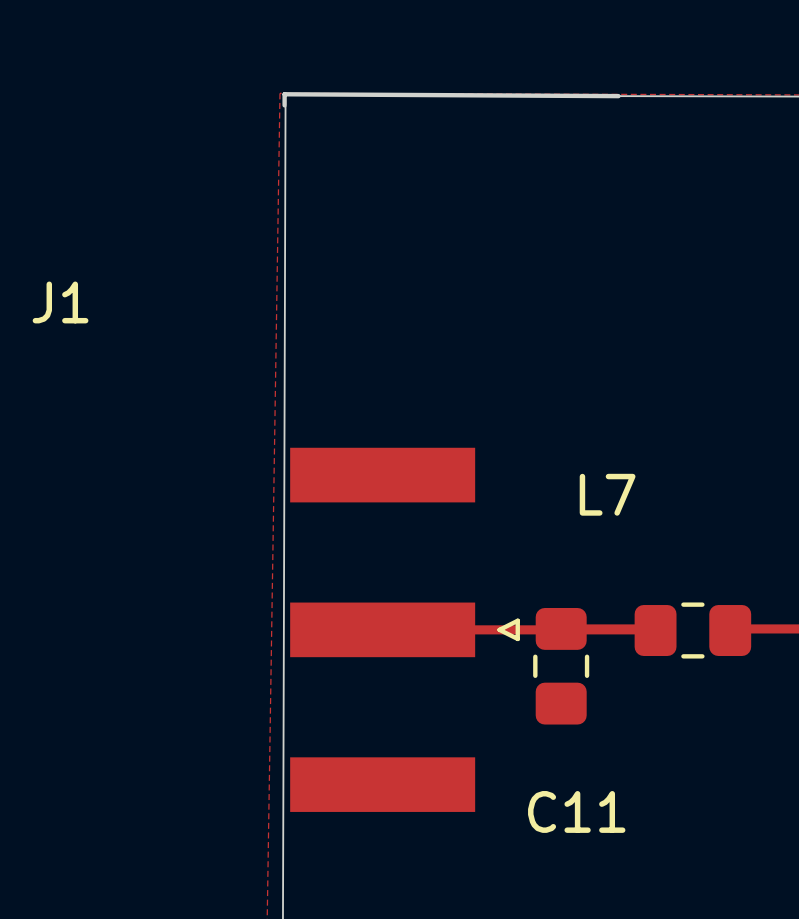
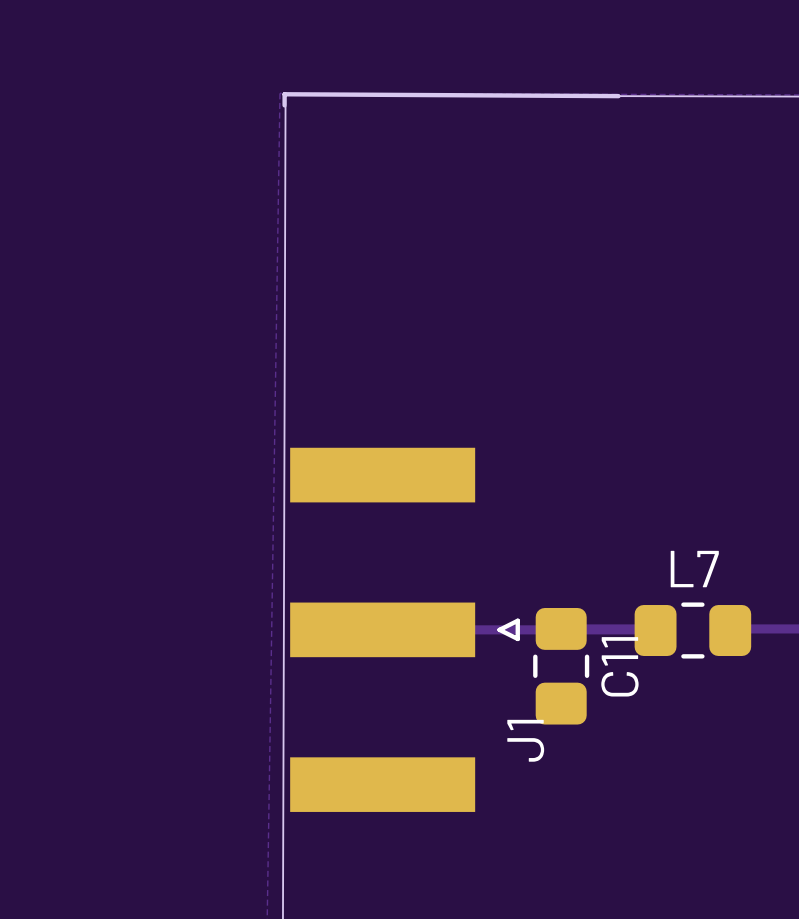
J1 name rotation: 0° (60, 302) -> 90° counterclockwise (525, 740)
J1 name position: J1 (60, 302) -> J1 (525, 740)
L7 name position: L7 (607, 494) -> L7 (694, 569)
C11 name rotation: 0° (576, 811) -> 90° counterclockwise (619, 666)
C11 name position: C11 (576, 811) -> C11 (619, 666)

